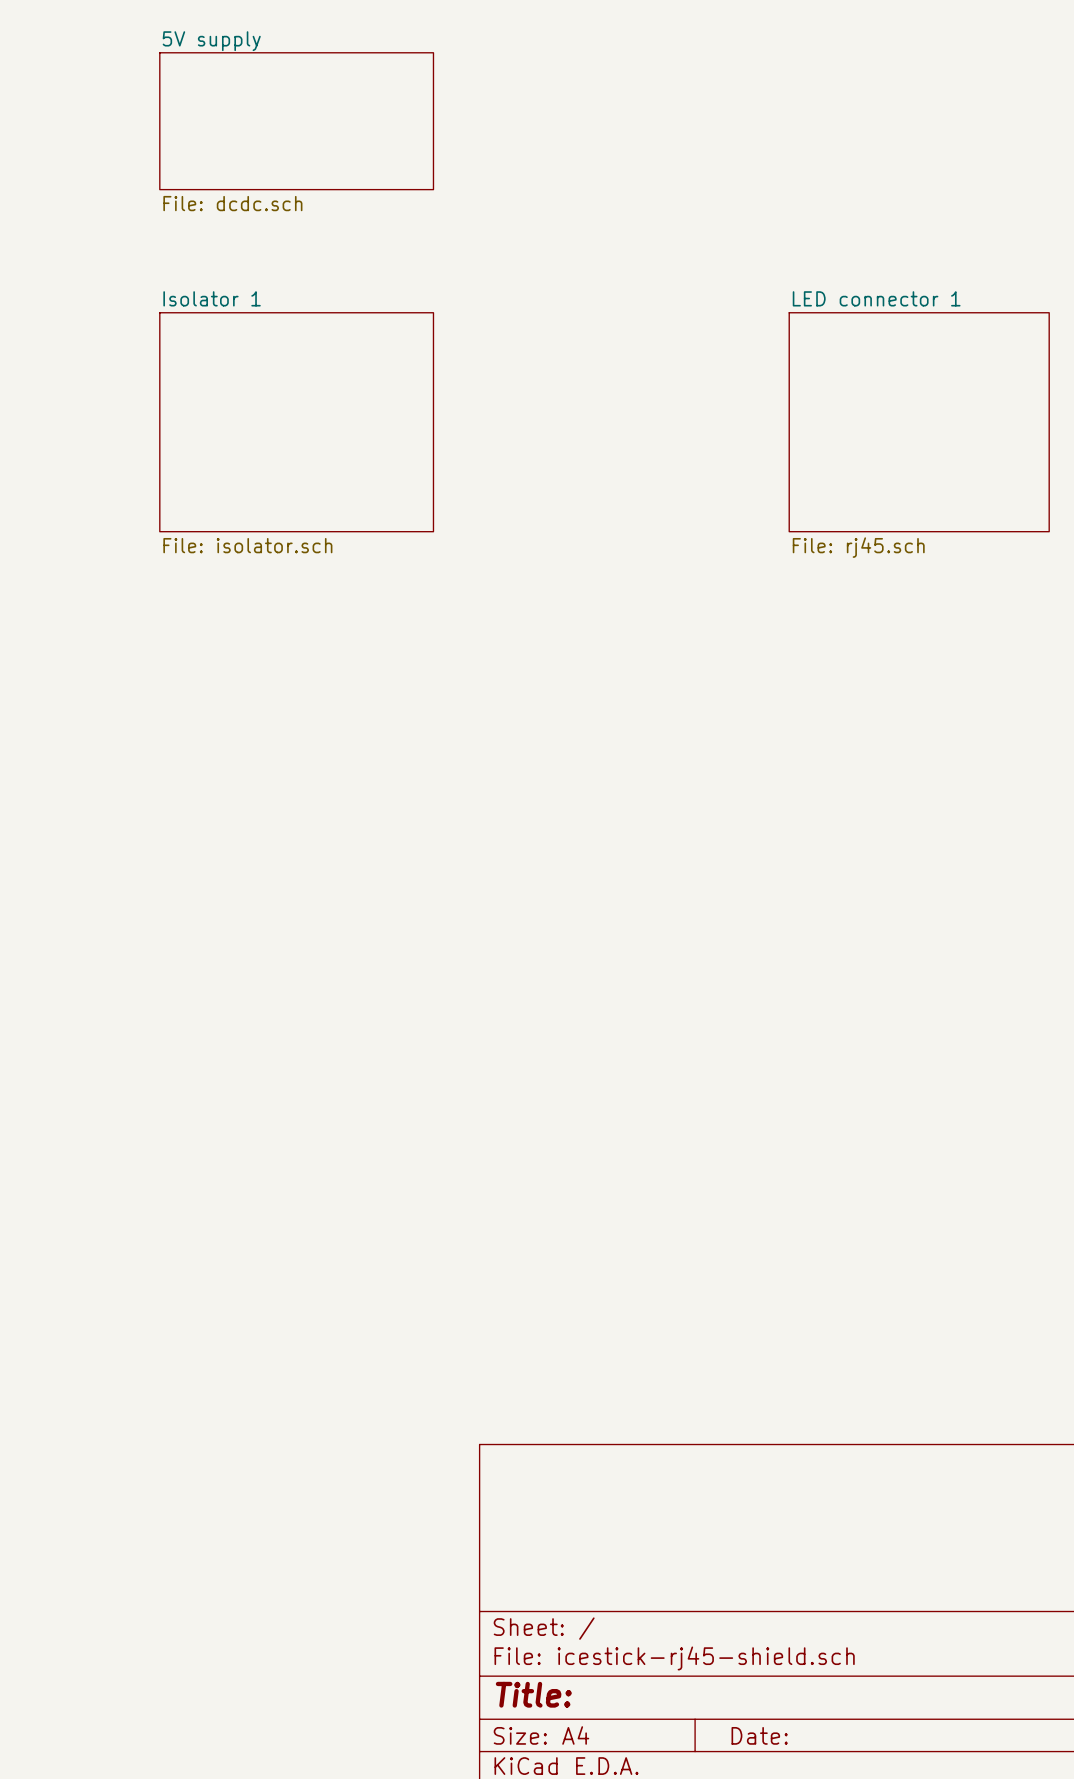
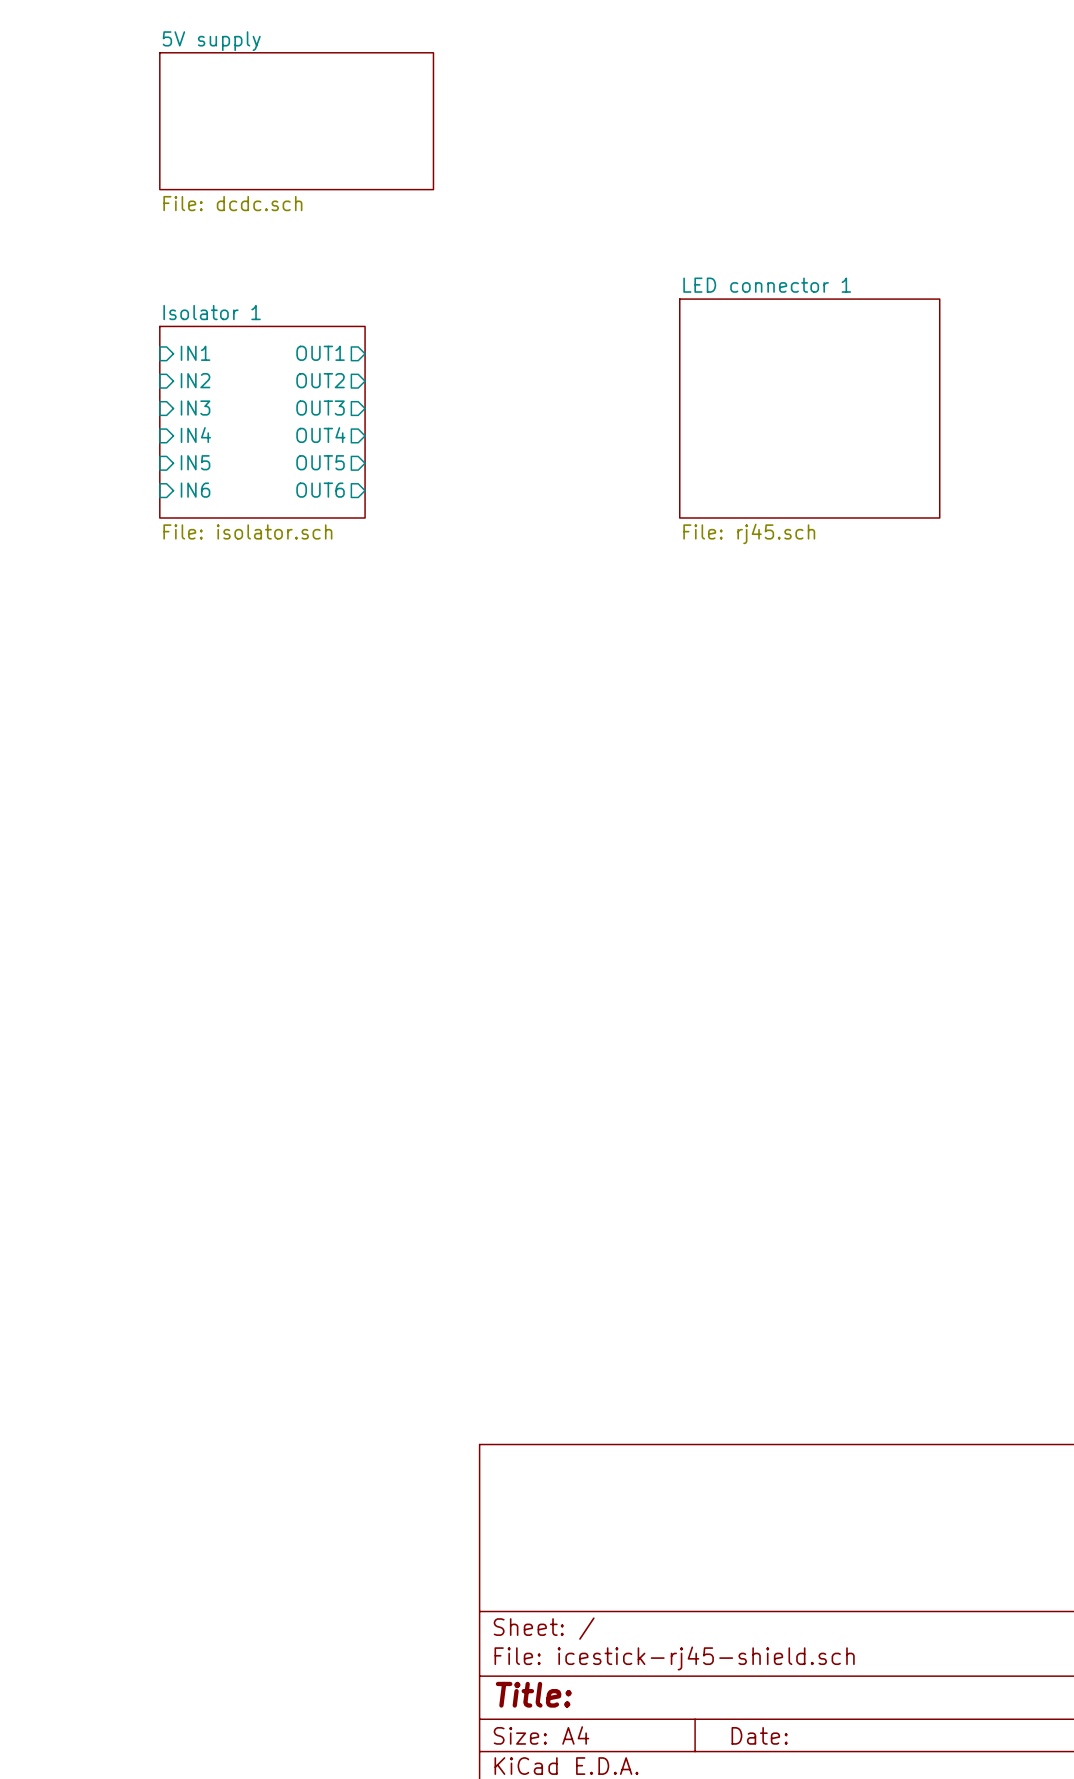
sheet Isolator 1 name position: Isolator 1 (212, 298) -> Isolator 1 (212, 312)
sheet Isolator 1 shape: [159, 312, 434, 532] -> [159, 326, 366, 519]
sheet pin: none -> IN1 (195, 353)
sheet pin: none -> OUT1 (320, 353)
sheet pin: none -> IN2 (195, 380)
sheet pin: none -> OUT2 (320, 380)
sheet pin: none -> IN3 (195, 408)
sheet pin: none -> OUT3 (320, 408)
sheet LED connector 1 position: (919, 422) -> (809, 408)
sheet pin: none -> IN4 (195, 435)
sheet pin: none -> OUT4 (320, 435)
sheet pin: none -> IN5 (195, 462)
sheet pin: none -> OUT5 (320, 462)
sheet pin: none -> IN6 (195, 490)
sheet pin: none -> OUT6 (320, 490)
sheet Isolator 1 value position: File: isolator.sch (247, 545) -> File: isolator.sch (247, 531)

